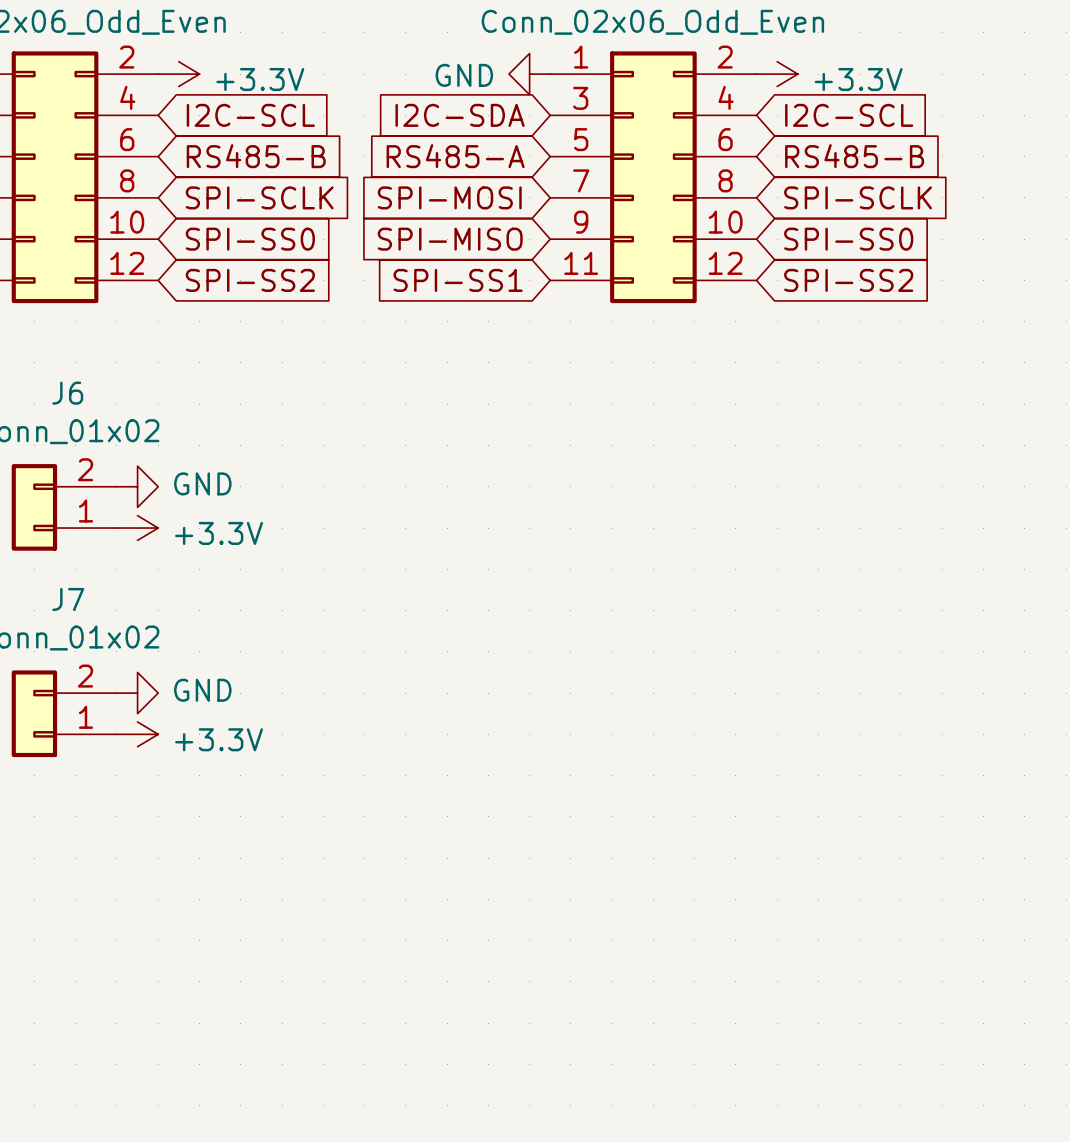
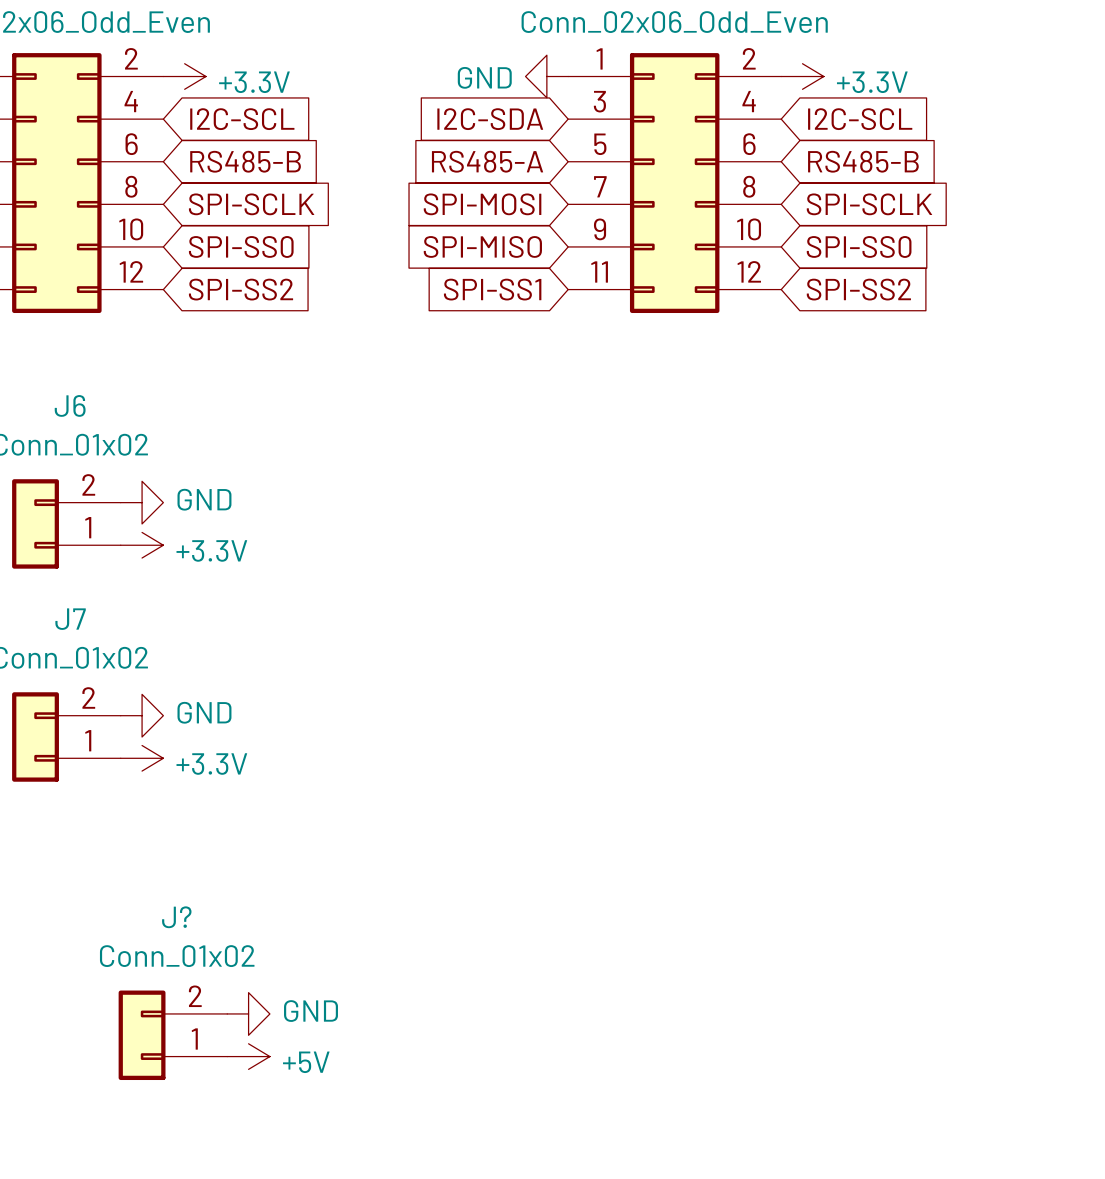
power symbol: none -> GND (248, 1013)
J?: none -> Conn_01x02 (172, 1035)
power symbol: none -> +5V (248, 1056)

